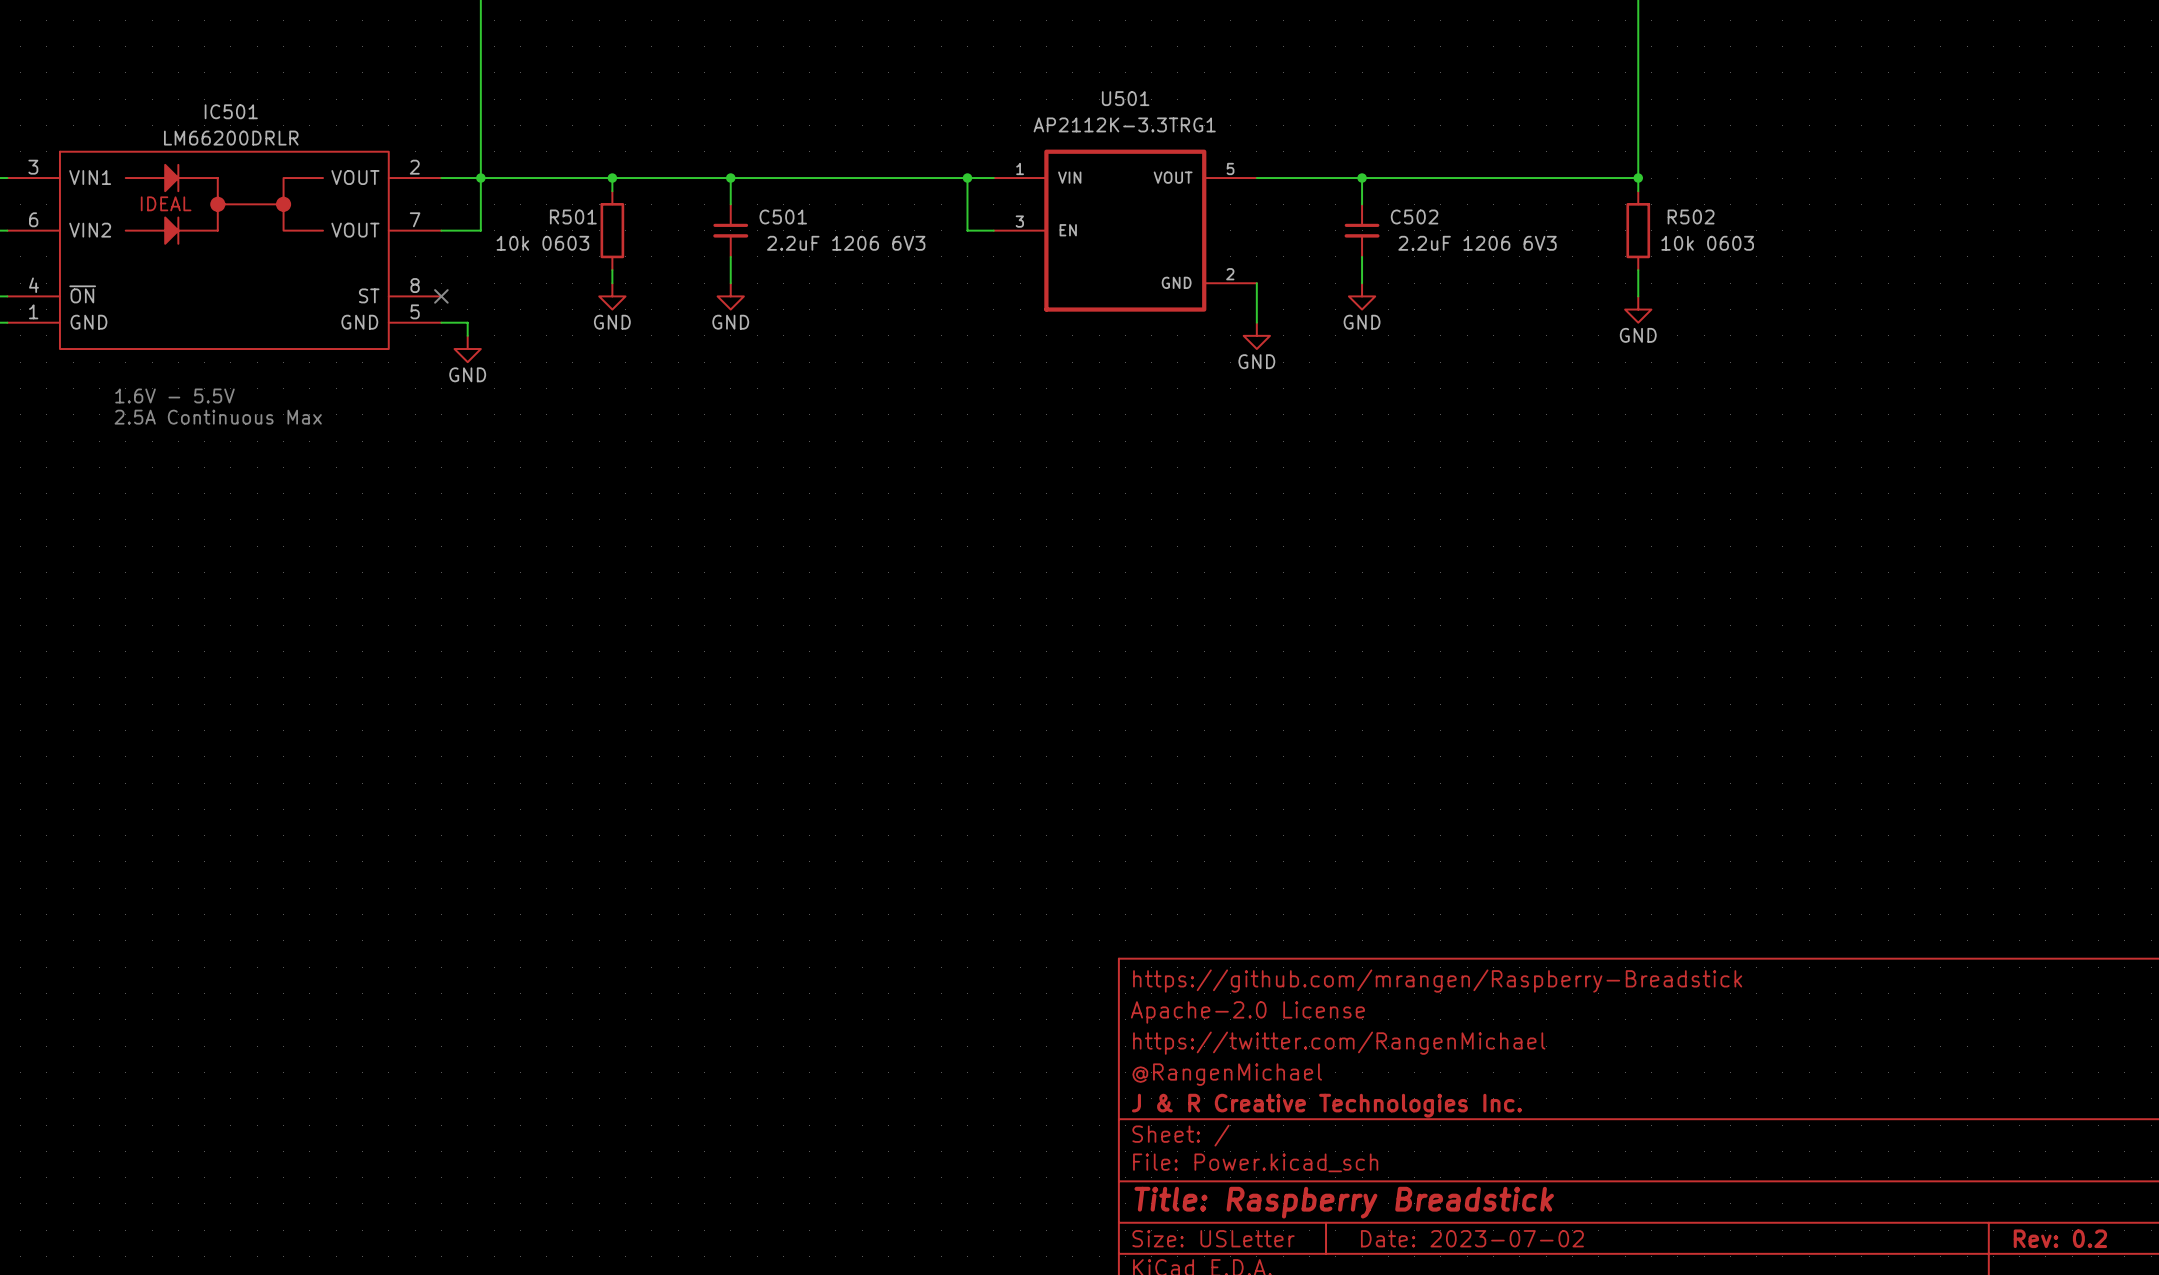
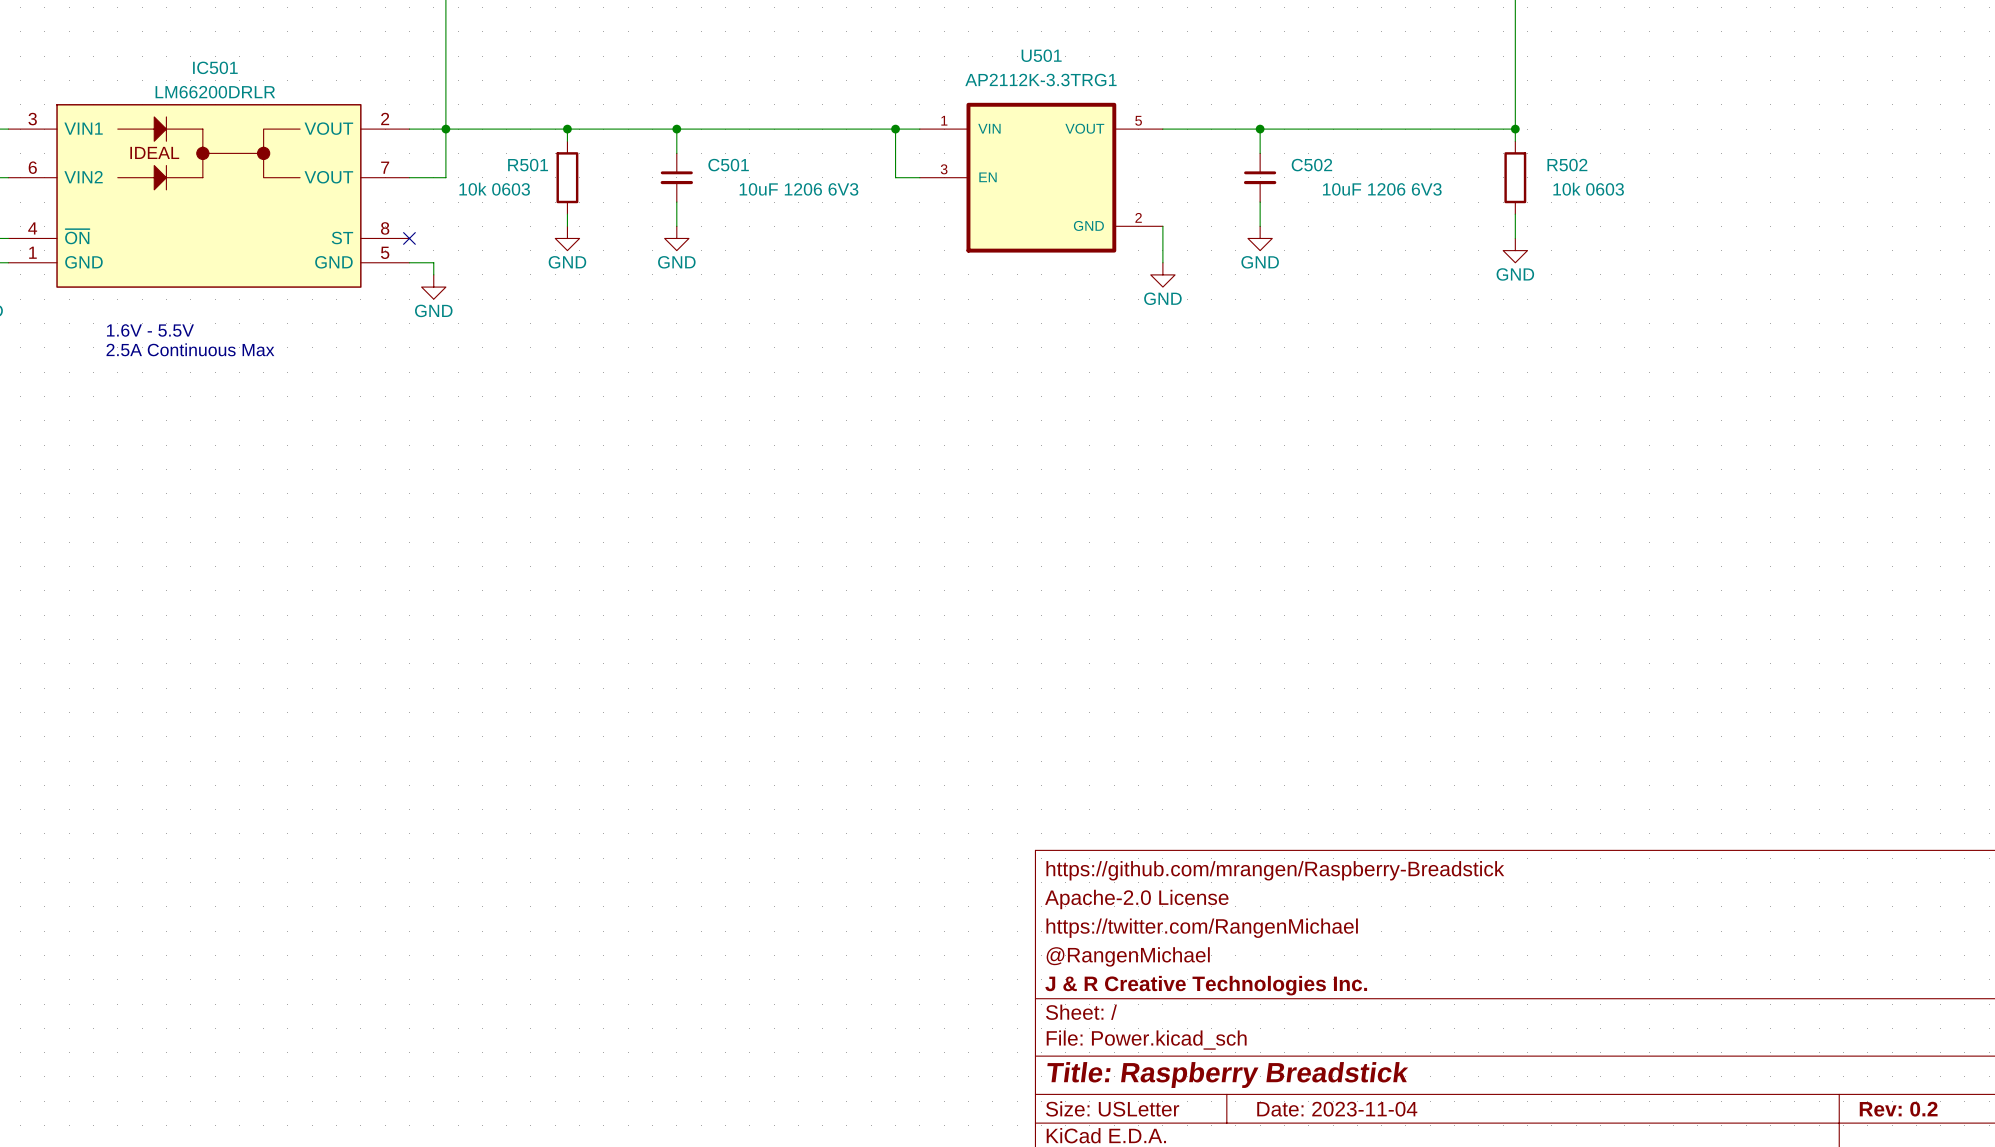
C501 value: 2.2uF 1206 6V3 (846, 243) -> 10uF 1206 6V3 (798, 189)
C502 value: 2.2uF 1206 6V3 (1477, 243) -> 10uF 1206 6V3 (1382, 189)
title block: Date: 2023-07-02 (1472, 1238) -> Date: 2023-11-04 (1337, 1109)

